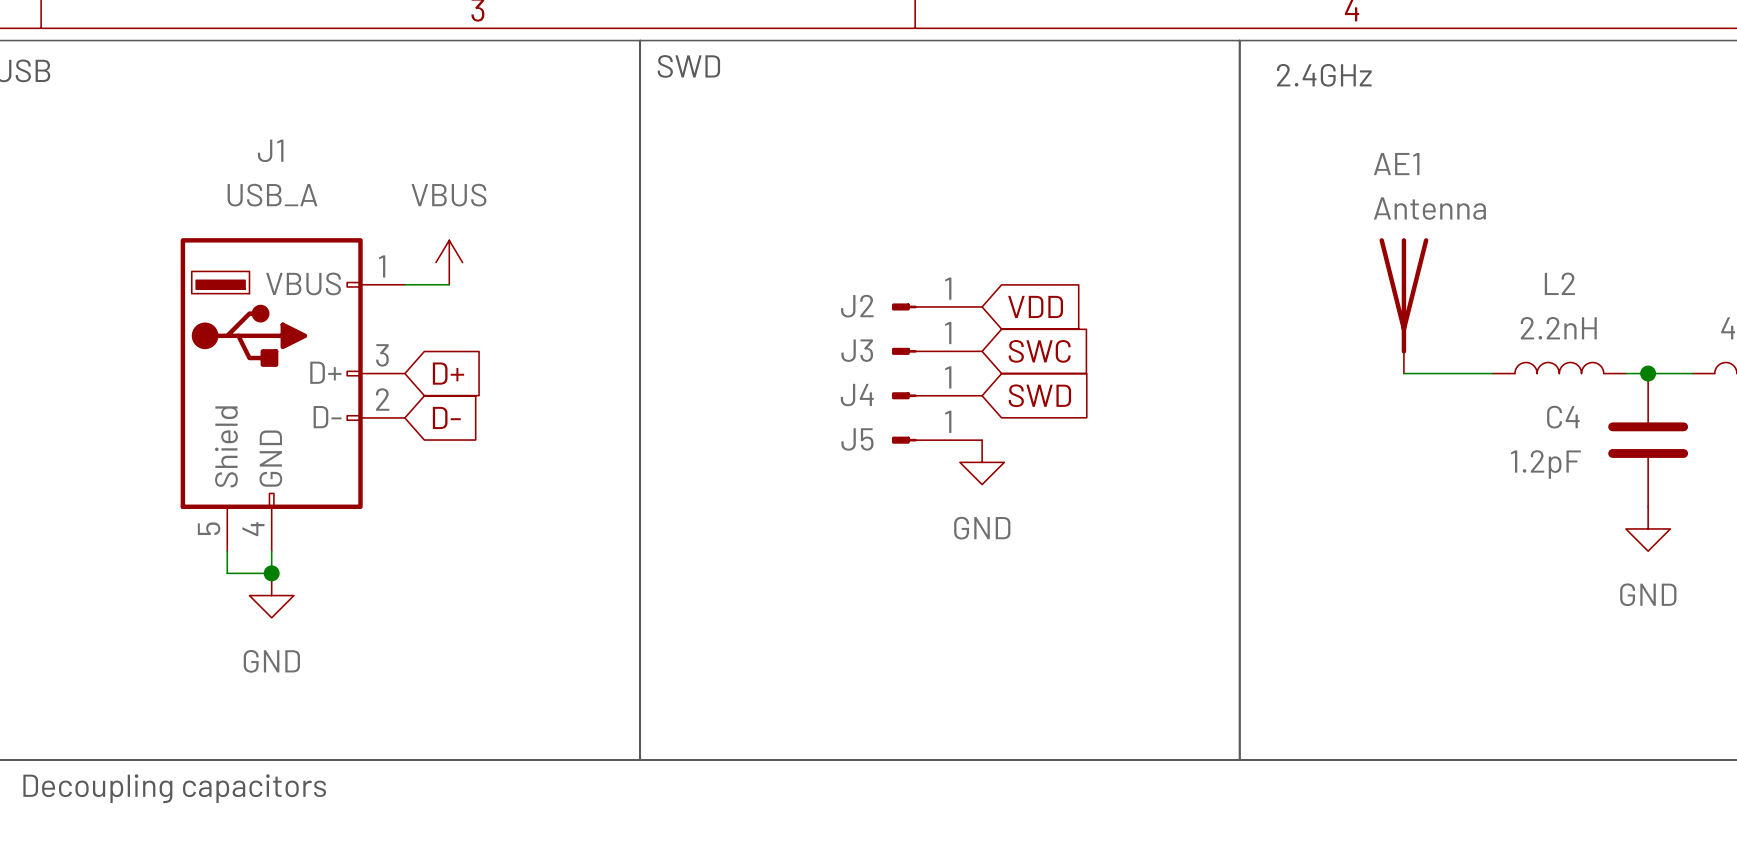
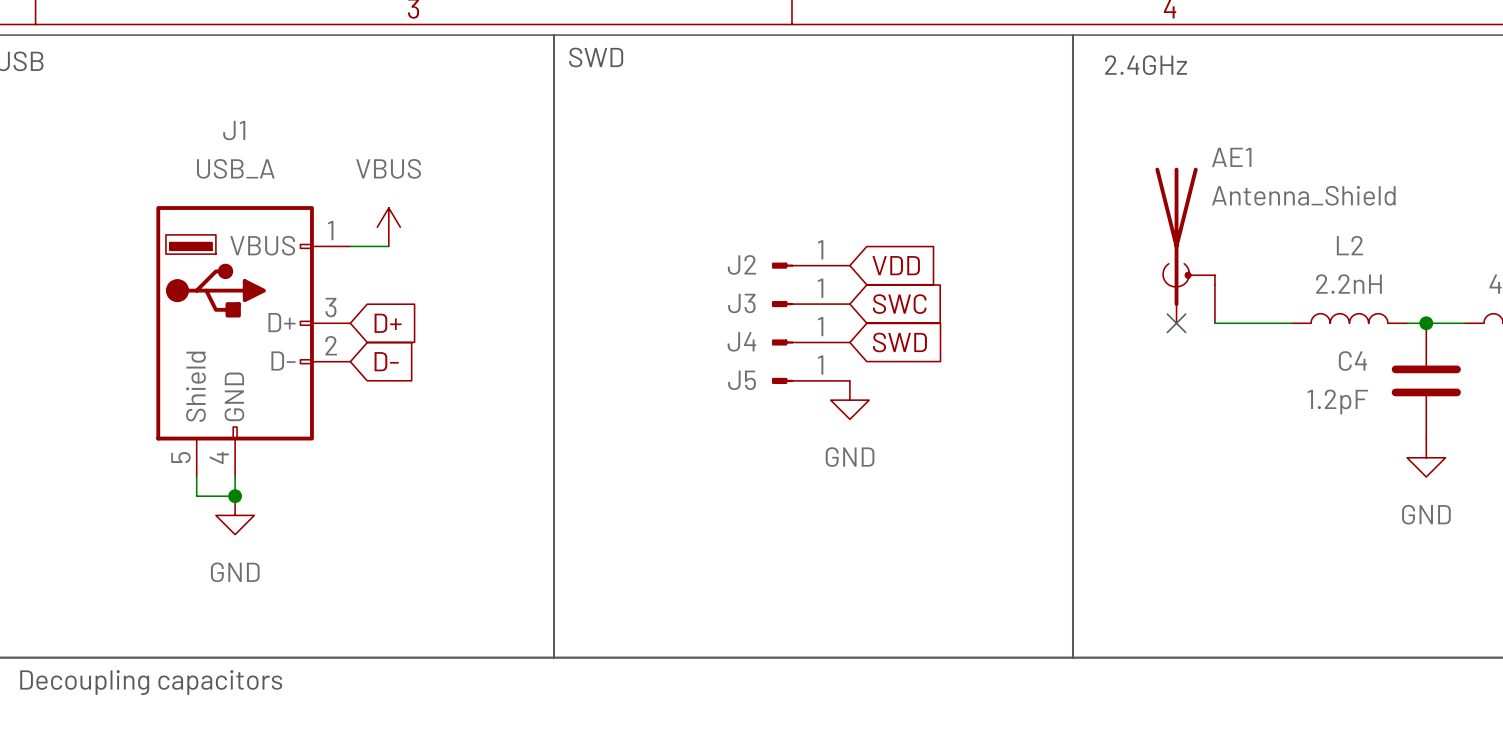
AE1 name position: AE1 (1396, 164) -> AE1 (1231, 157)
AE1 value: Antenna (1429, 208) -> Antenna_Shield (1303, 195)
AE1 symbol: [1379, 238, 1429, 374] -> [1155, 167, 1215, 324]
no-connect mark: none -> (1176, 323)

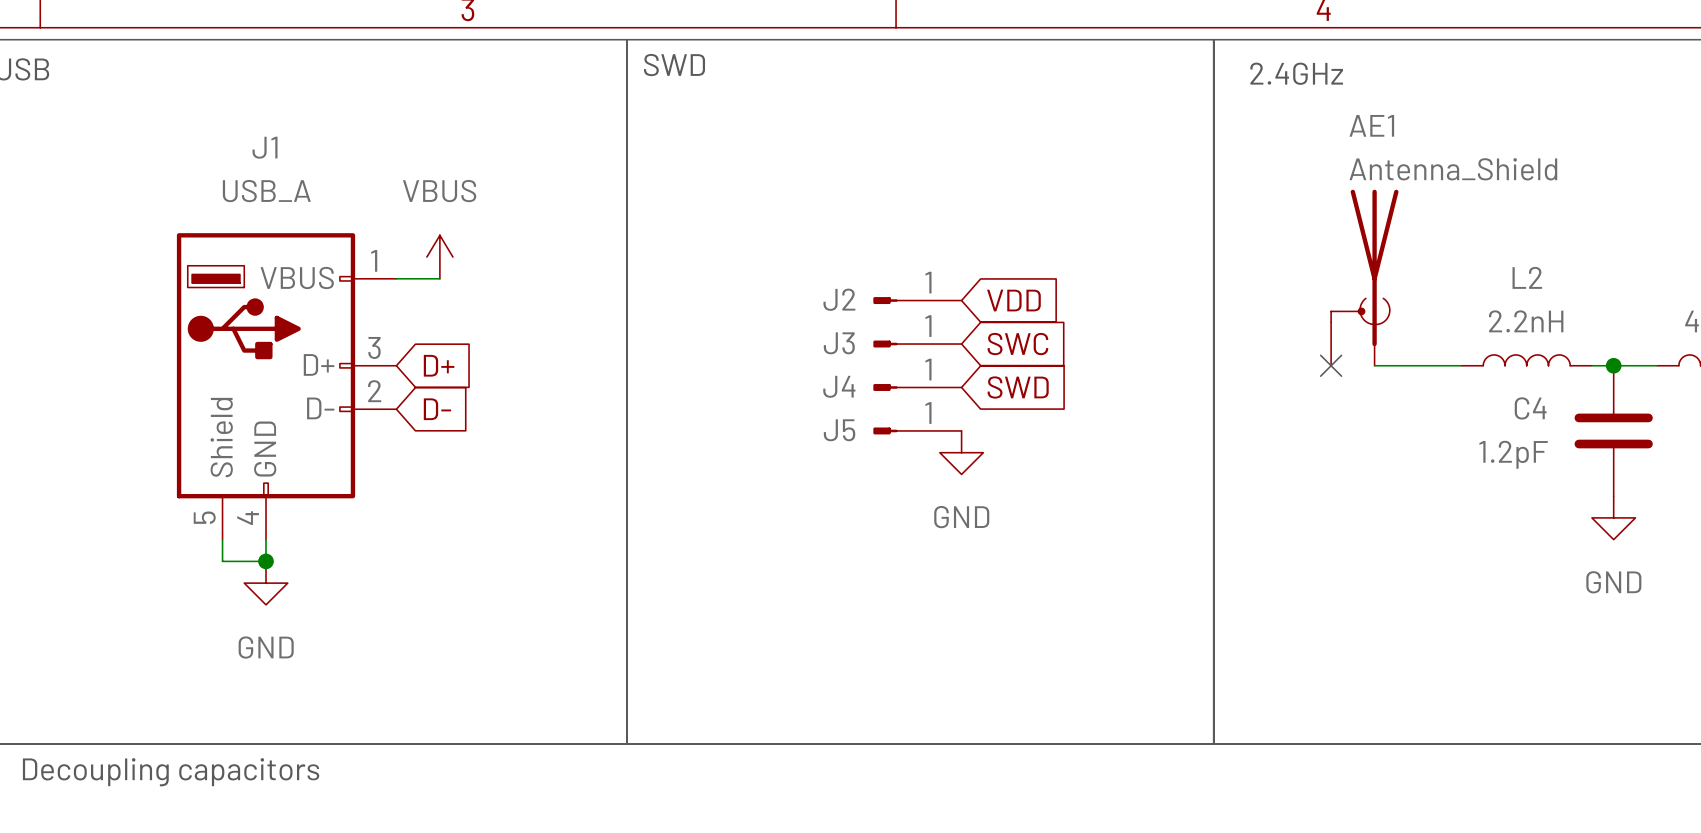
AE1 name position: AE1 (1231, 157) -> AE1 (1371, 125)
AE1 value position: Antenna_Shield (1303, 195) -> Antenna_Shield (1453, 169)
AE1 flip: as is (1185, 236) -> left-right (1364, 267)

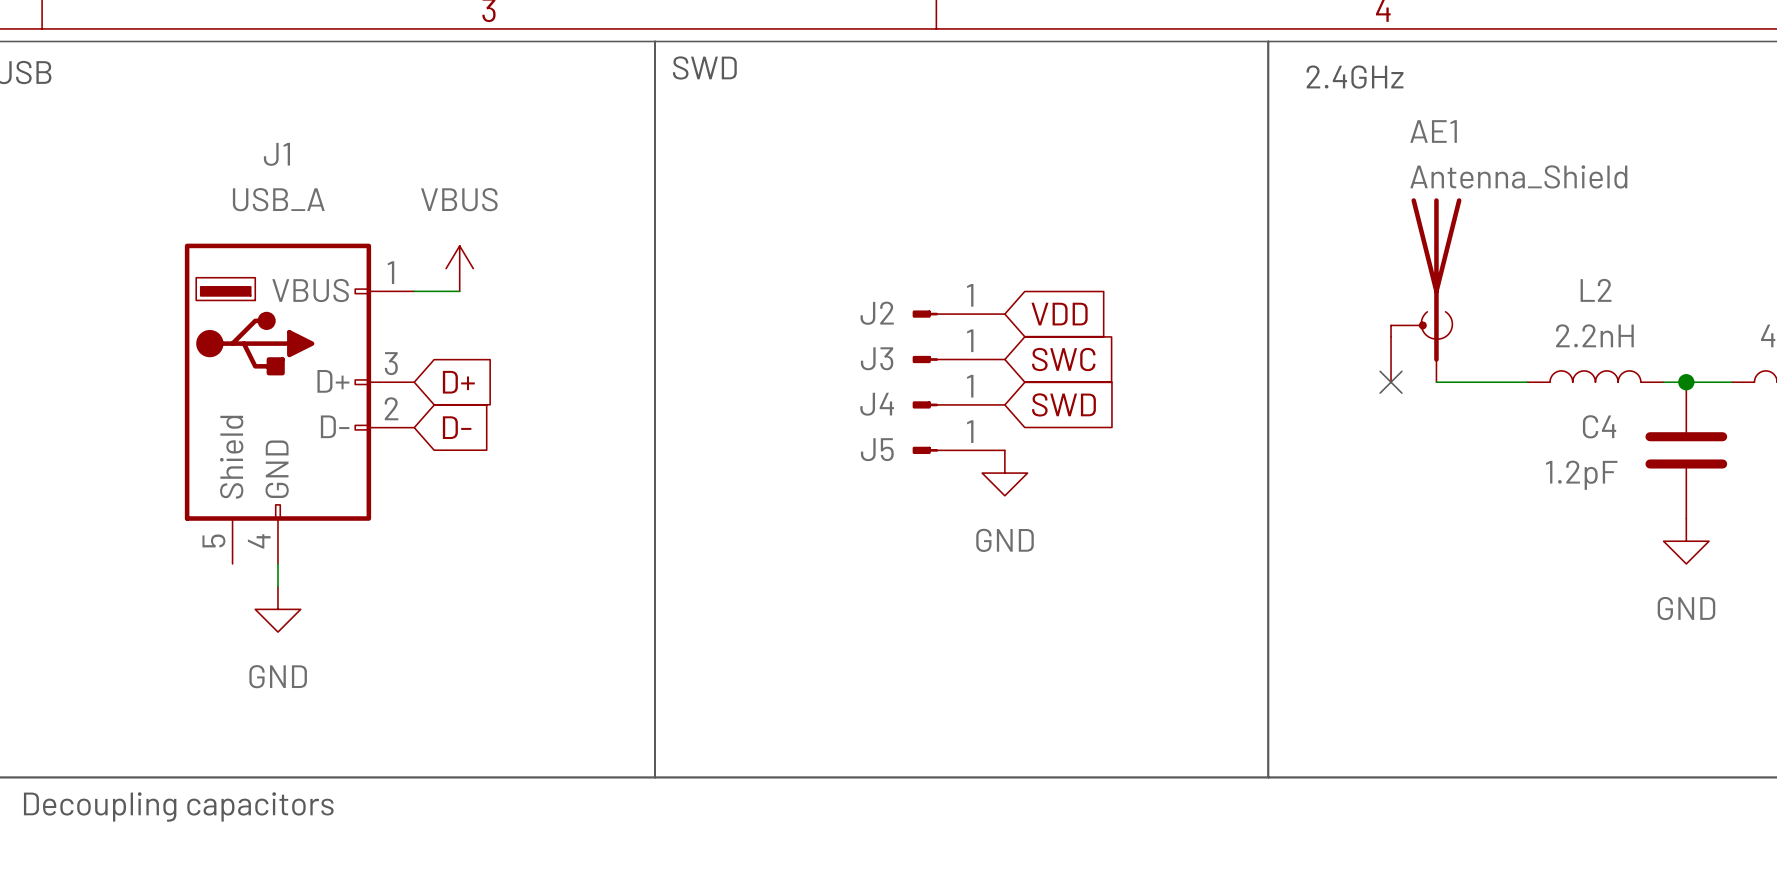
wire: (222, 539) (222, 561) (266, 561) -> none
junction: (266, 561) -> none

